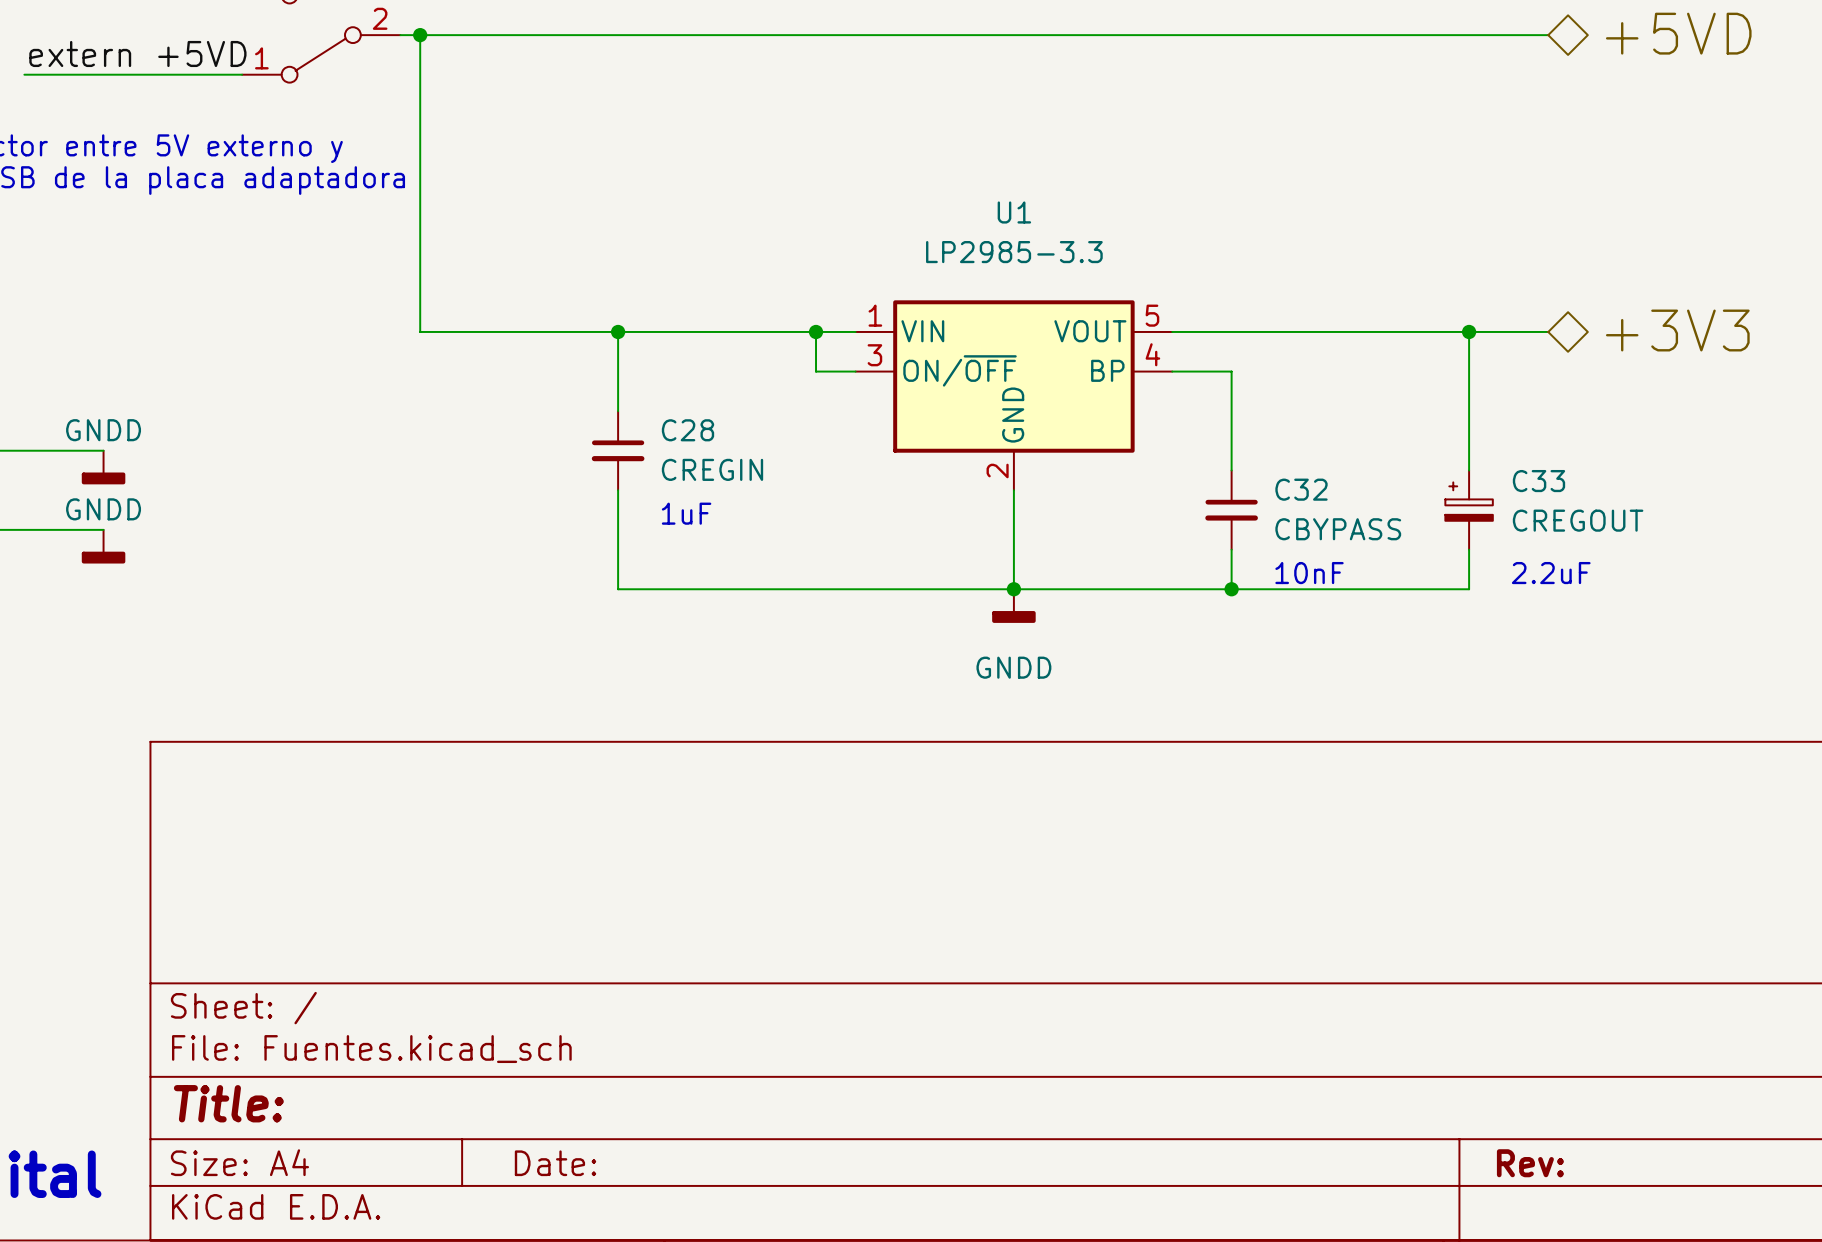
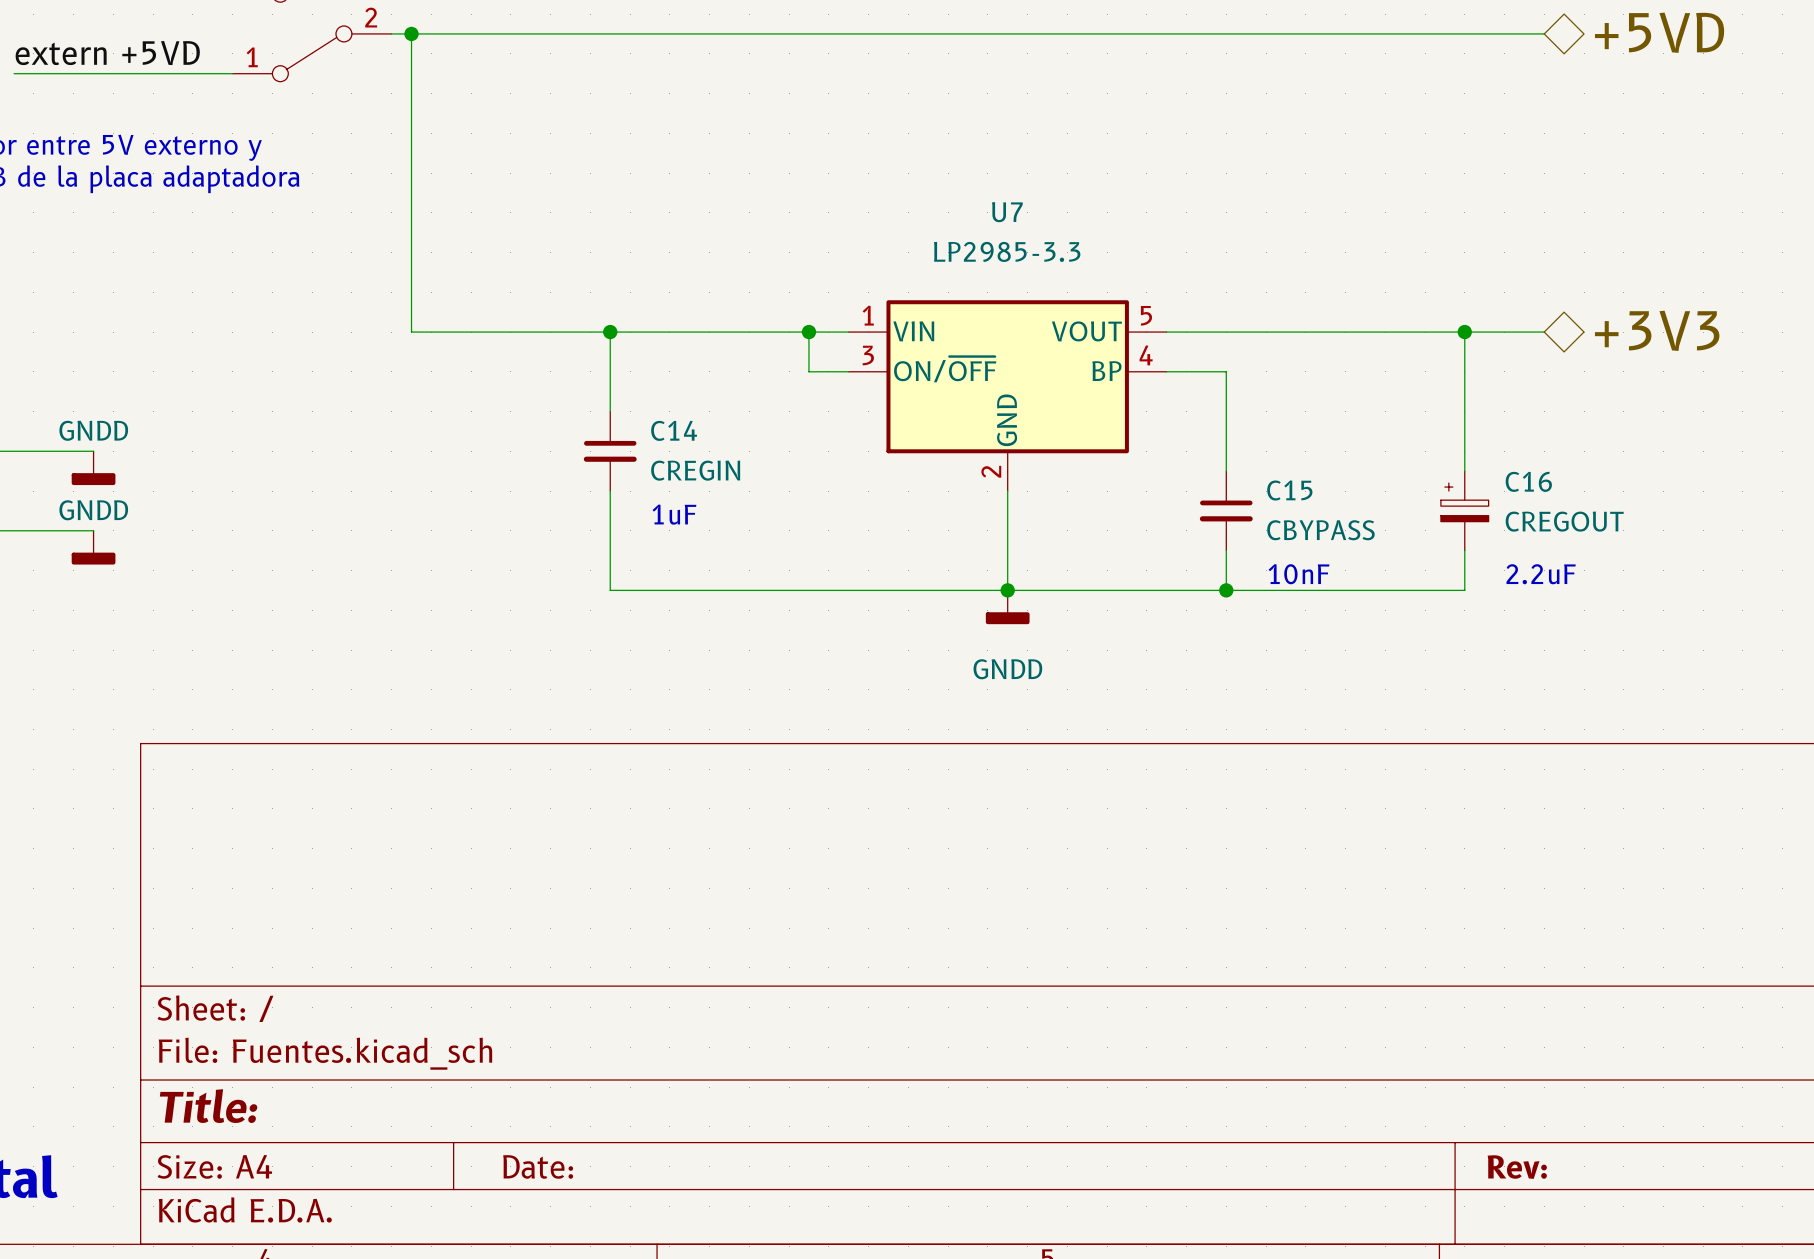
U1 name: U1 (1014, 212) -> U7 (1007, 212)
C28 name: C28 (687, 430) -> C14 (674, 430)
C33 name: C33 (1538, 481) -> C16 (1528, 481)
C32 name: C32 (1301, 489) -> C15 (1289, 490)

